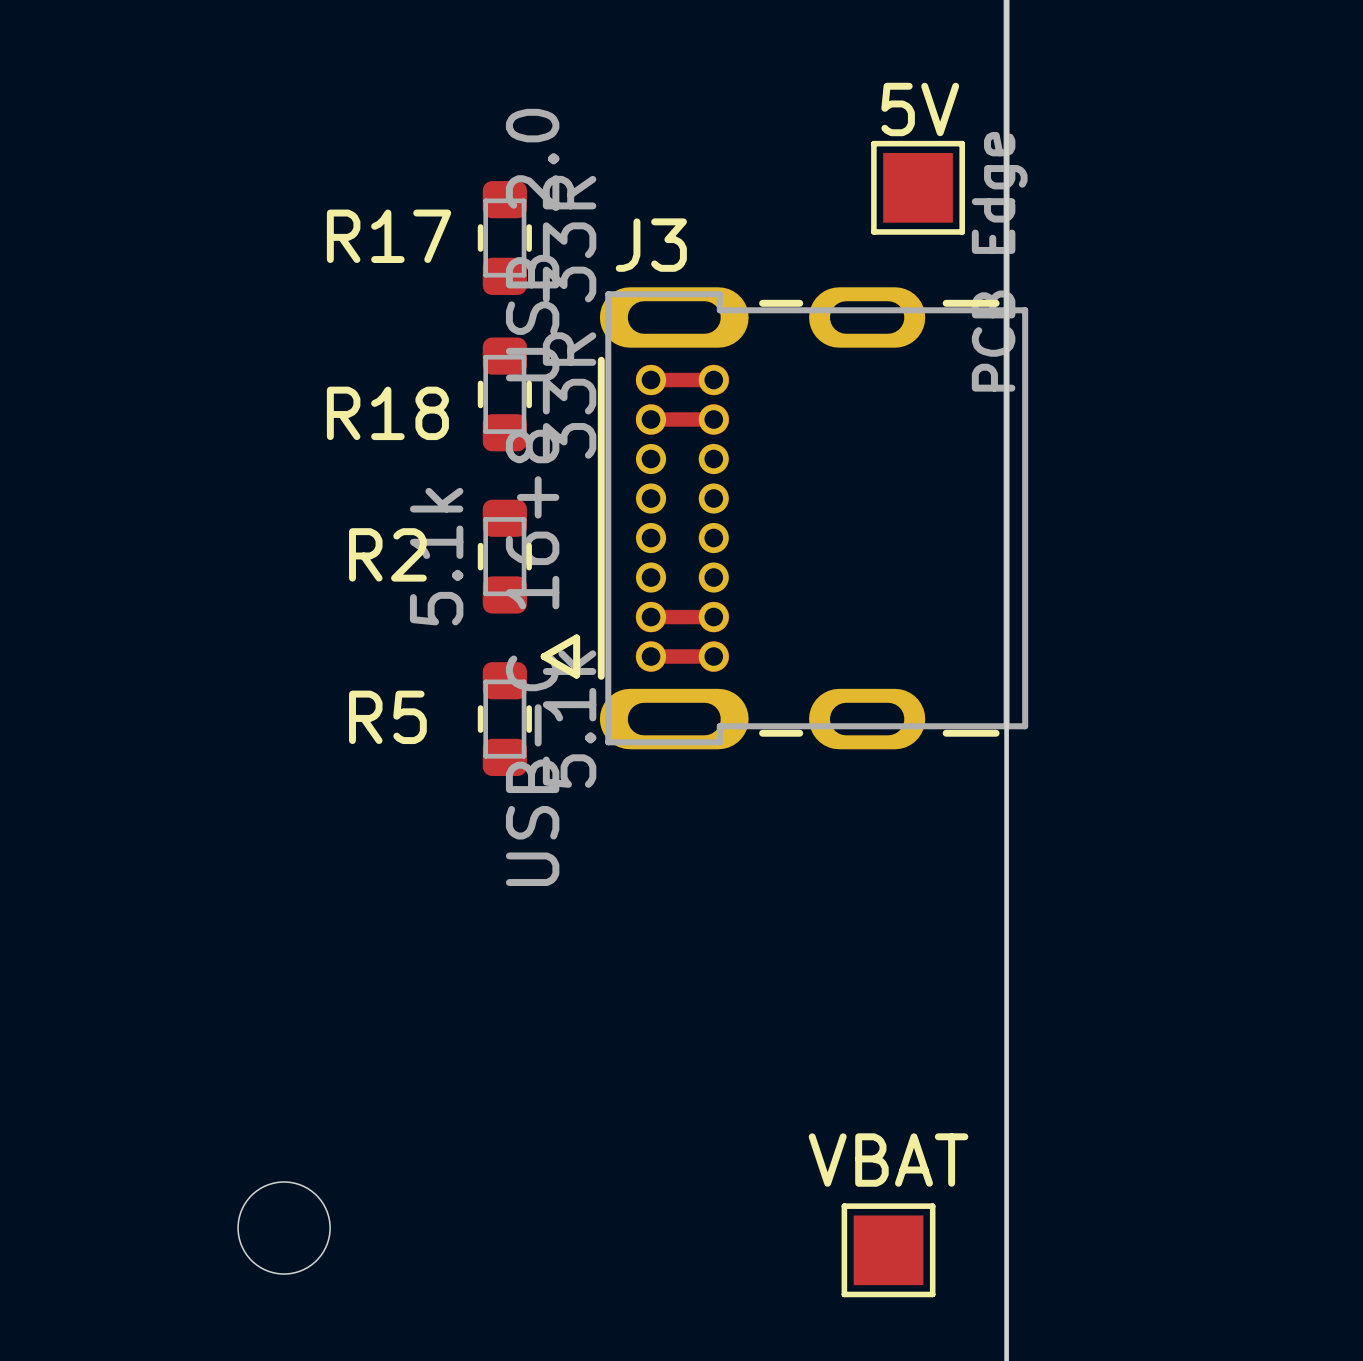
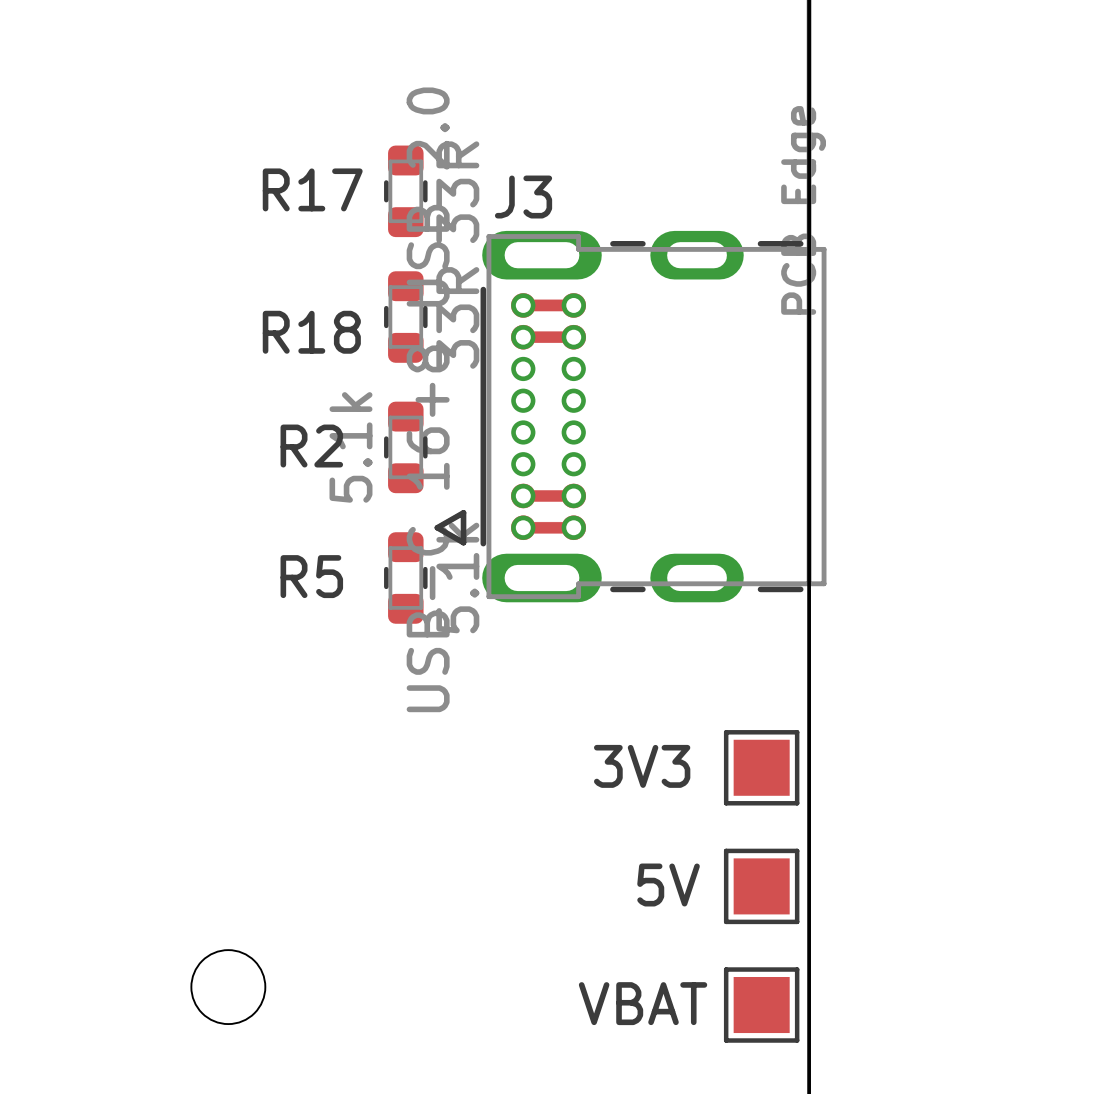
5V name position: 5V (920, 109) -> 5V (668, 885)
5V position: (918, 187) -> (761, 886)
part: none -> (761, 767)
VBAT name position: VBAT (888, 1160) -> VBAT (643, 1003)
VBAT position: (888, 1250) -> (761, 1005)

